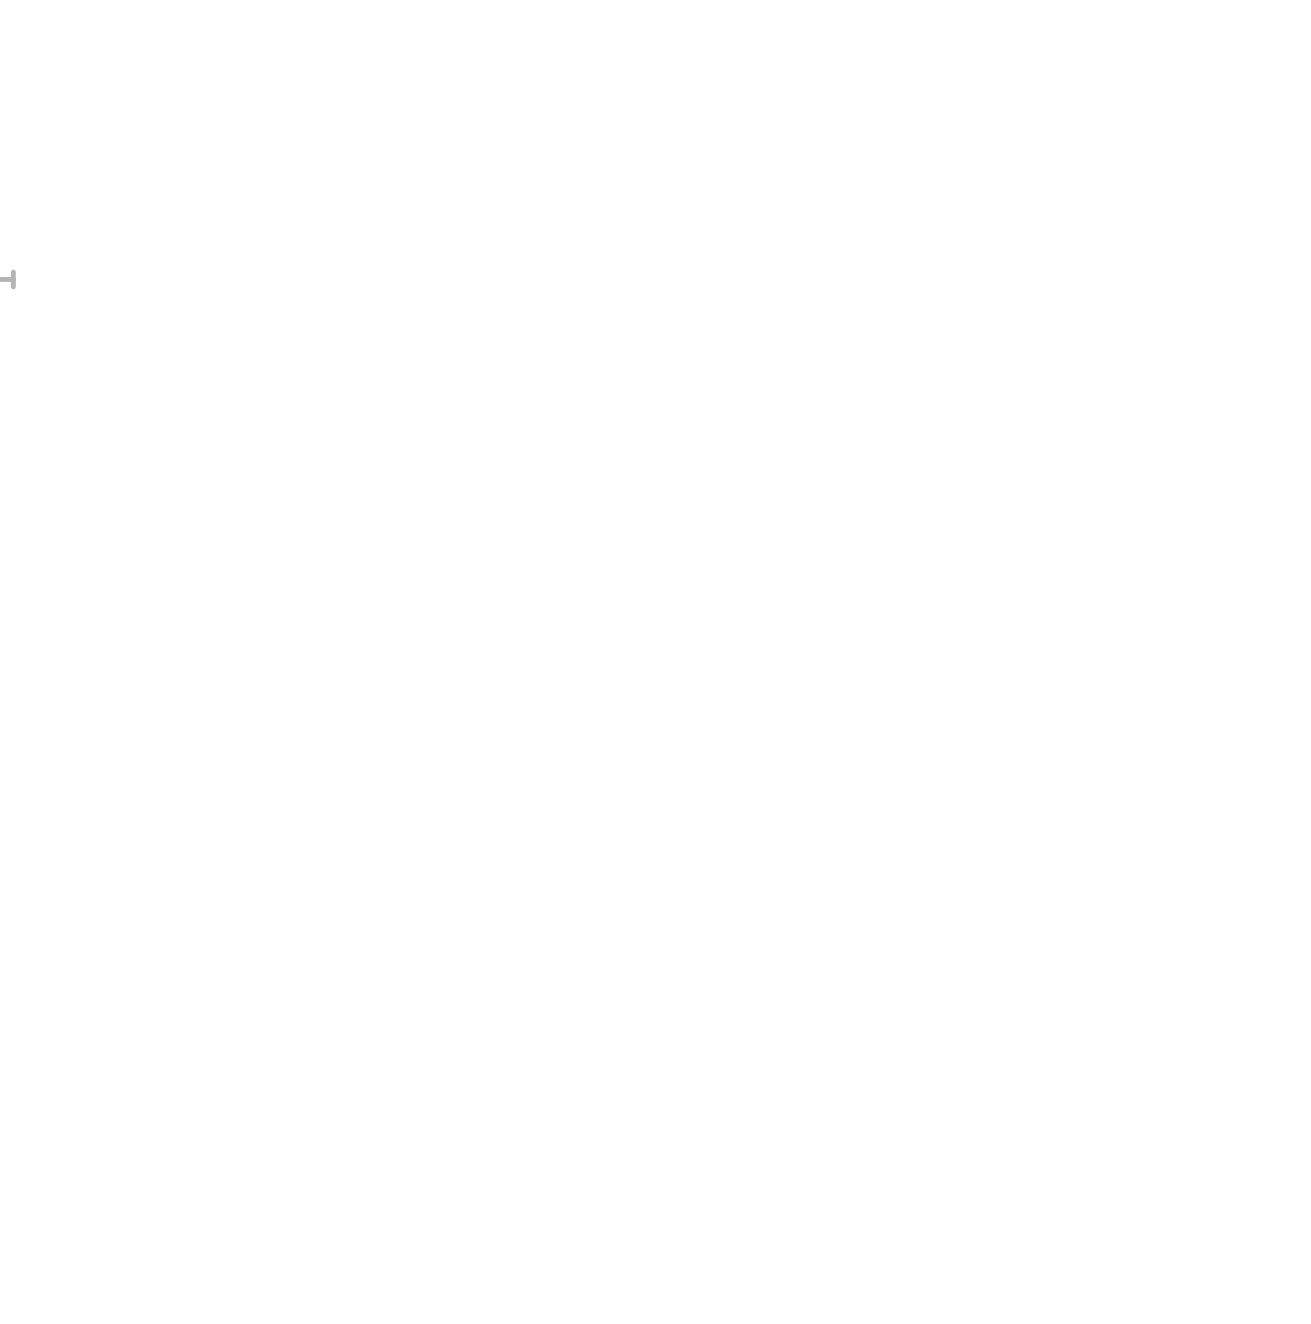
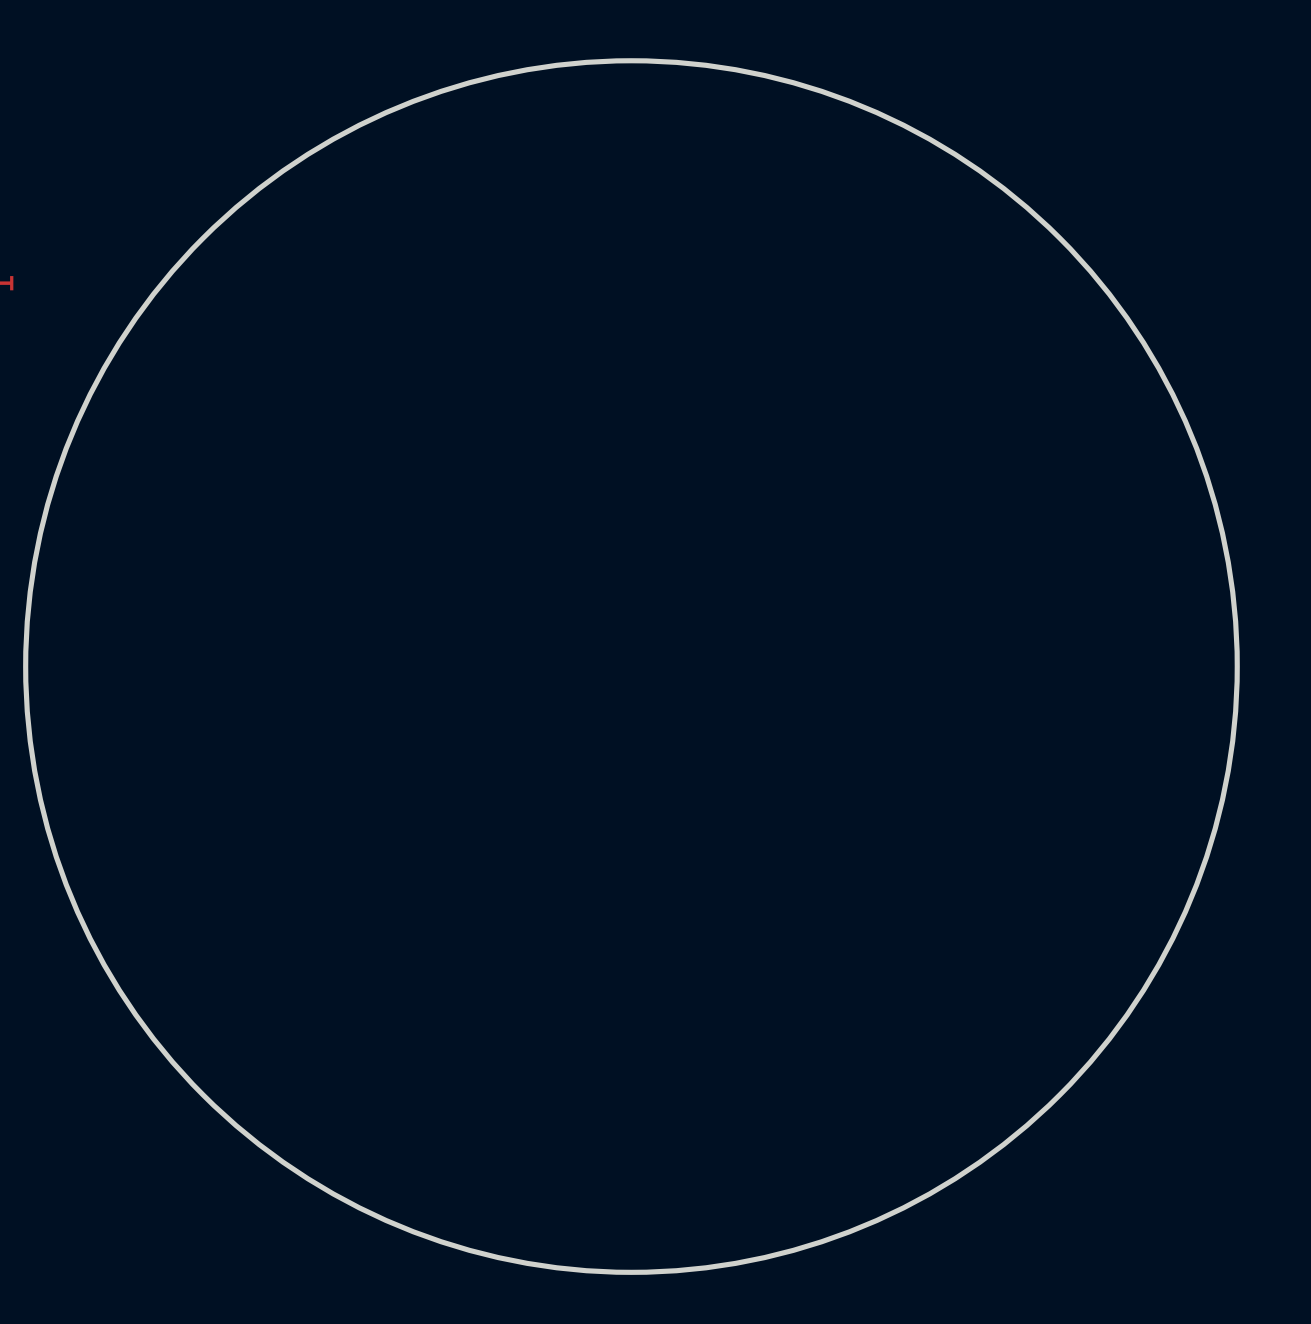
round board edge: none -> [23, 58, 1240, 1275]

